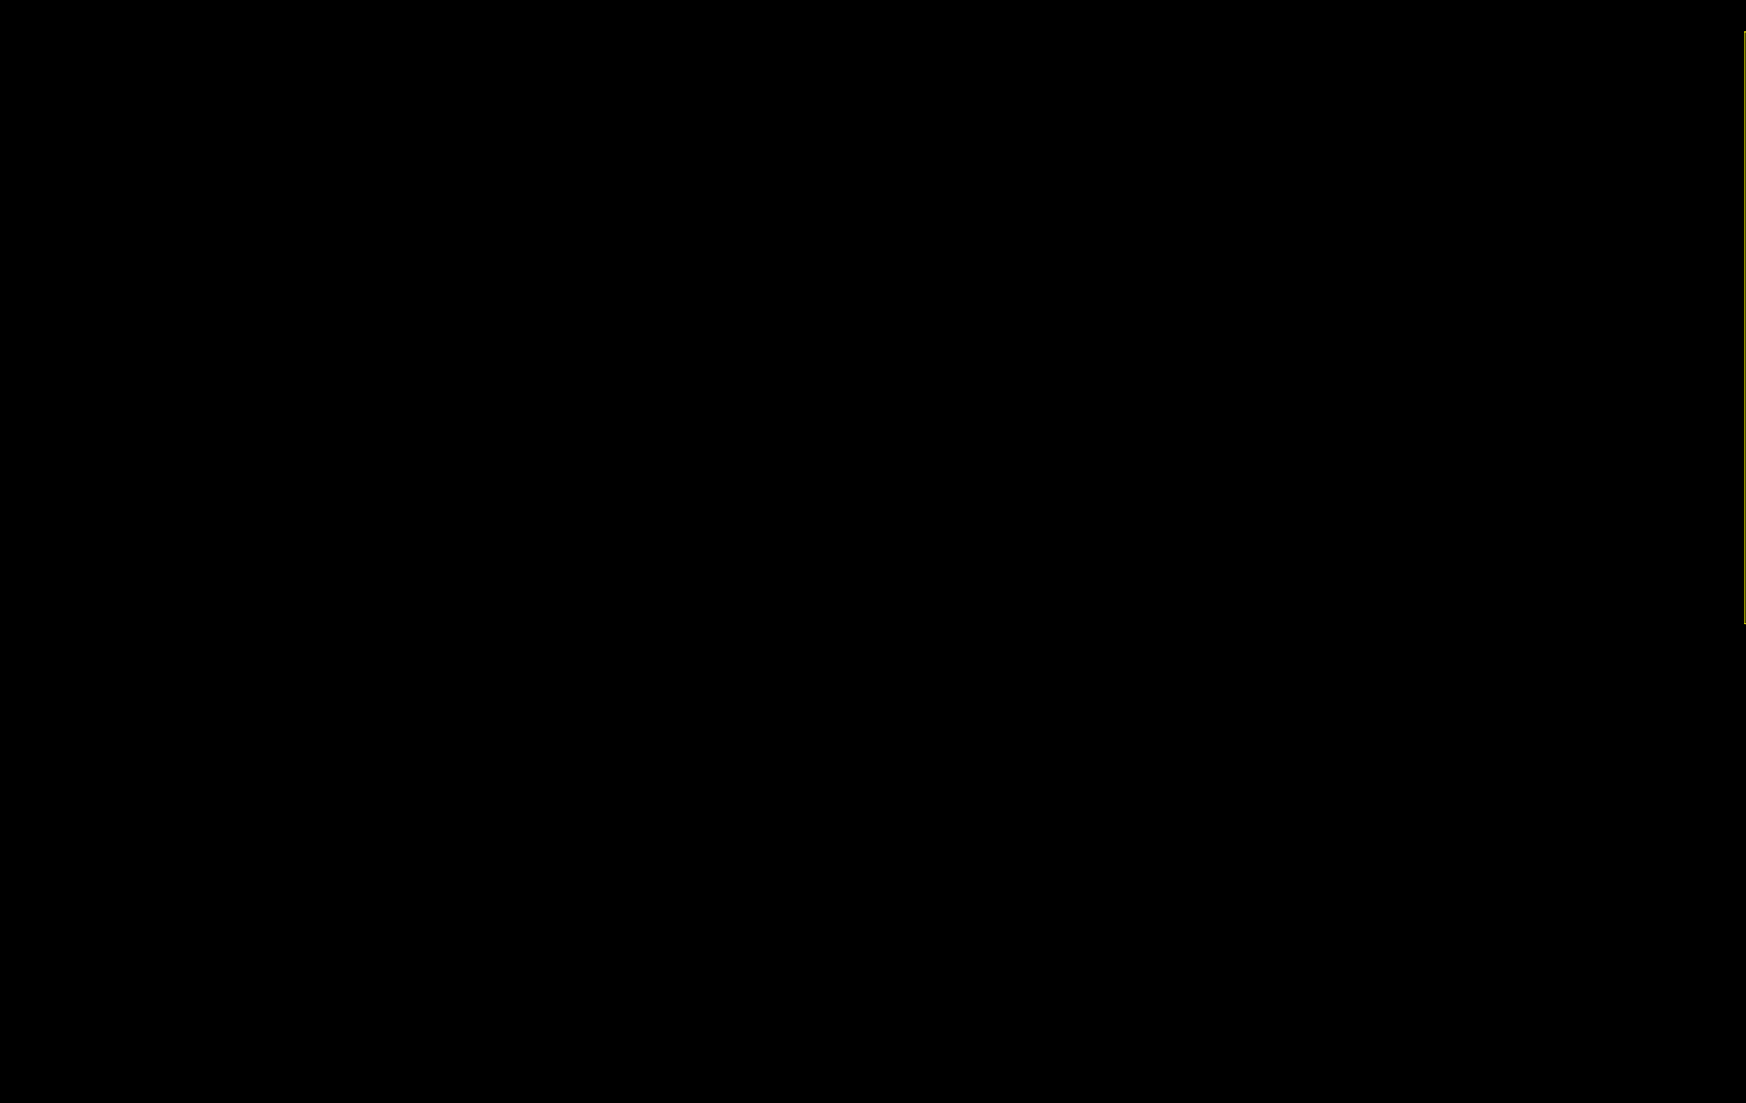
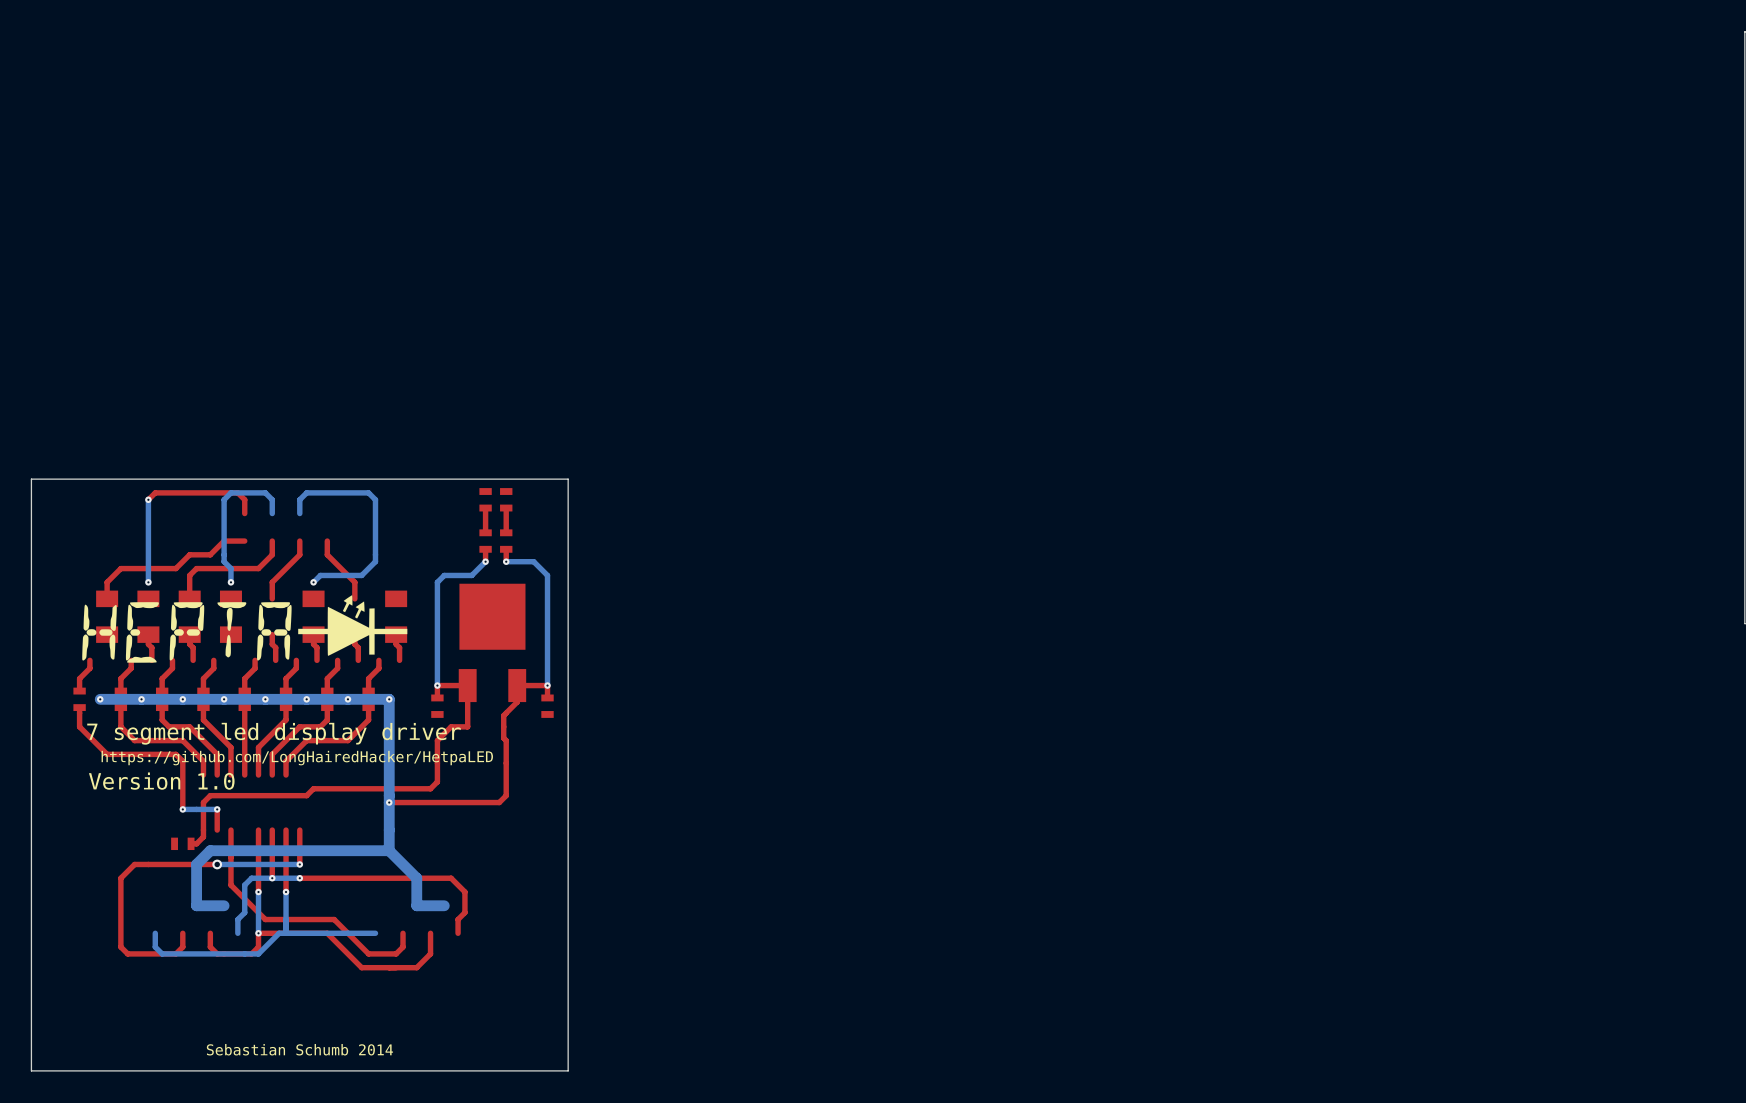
board edge: none -> (568, 479) (31, 479) (31, 1070) (568, 1070) (568, 479)
top track: none -> (148, 499) (155, 492) (237, 492) (244, 499) (244, 513)
bottom track: none -> (148, 499) (148, 582)
via: none -> (148, 499)
part: none -> (485, 499)
part: none -> (506, 499)
top track: none -> (485, 508) (485, 532)
top track: none -> (506, 508) (506, 532)
bottom track: none -> (272, 513) (272, 499) (265, 492) (230, 492) (224, 499) (224, 561) (230, 568) (230, 582)
bottom track: none -> (299, 513) (299, 499) (306, 492) (368, 492) (375, 499) (375, 561) (361, 575) (320, 575) (313, 582)
top track: none -> (244, 541) (224, 541) (210, 554) (189, 554) (175, 568) (120, 568) (107, 582) (107, 598)
top track: none -> (272, 541) (272, 554) (258, 568) (196, 568) (189, 575) (189, 598)
top track: none -> (299, 541) (299, 554) (272, 582) (272, 598)
top track: none -> (327, 541) (327, 554) (354, 582) (354, 598)
part: none -> (485, 541)
part: none -> (506, 541)
top track: none -> (485, 549) (485, 561)
top track: none -> (506, 549) (506, 561)
bottom track: none -> (485, 561) (471, 575) (444, 575) (437, 582) (437, 685)
via: none -> (485, 561)
bottom track: none -> (506, 561) (533, 561) (547, 575) (547, 685)
via: none -> (506, 561)
via: none -> (148, 582)
via: none -> (230, 582)
via: none -> (313, 582)
drawing: none -> [82, 595, 408, 663]
part: none -> (107, 616)
part: none -> (148, 616)
part: none -> (189, 616)
part: none -> (230, 616)
part: none -> (313, 616)
part: none -> (396, 616)
top track: none -> (148, 634) (148, 644) (151, 647) (151, 660)
top track: none -> (189, 634) (189, 644) (193, 647) (193, 660)
top track: none -> (272, 634) (272, 644) (275, 647) (275, 660)
top track: none -> (313, 634) (313, 644) (316, 647) (316, 660)
top track: none -> (354, 634) (354, 644) (358, 647) (358, 660)
top track: none -> (396, 634) (396, 644) (399, 647) (399, 660)
part: none -> (492, 642)
top track: none -> (89, 660) (89, 668) (79, 678) (79, 691)
top track: none -> (131, 660) (131, 668) (120, 678) (120, 691)
top track: none -> (172, 660) (172, 668) (162, 678) (162, 691)
top track: none -> (213, 660) (213, 668) (203, 678) (203, 691)
top track: none -> (255, 660) (255, 668) (244, 678) (244, 691)
top track: none -> (296, 660) (296, 668) (286, 678) (286, 691)
top track: none -> (337, 660) (337, 668) (327, 678) (327, 691)
top track: none -> (378, 660) (378, 668) (368, 678) (368, 691)
via: none -> (437, 685)
via: none -> (547, 685)
top track: none -> (437, 697) (437, 685) (467, 685) (467, 726) (451, 726) (437, 740) (437, 781) (430, 788) (313, 788) (306, 795) (210, 795) (203, 802) (203, 836) (196, 843) (191, 843)
top track: none -> (547, 697) (547, 685) (517, 685) (517, 702) (503, 715) (503, 738) (506, 740) (506, 795) (499, 802) (389, 802)
part: none -> (79, 699)
bottom track: none -> (100, 699) (389, 699) (389, 850)
via: none -> (100, 699)
part: none -> (120, 699)
via: none -> (141, 699)
part: none -> (162, 699)
via: none -> (182, 699)
part: none -> (203, 699)
via: none -> (224, 699)
part: none -> (244, 699)
via: none -> (265, 699)
part: none -> (286, 699)
via: none -> (306, 699)
part: none -> (327, 699)
via: none -> (347, 699)
part: none -> (368, 699)
via: none -> (389, 699)
part: none -> (437, 706)
part: none -> (547, 706)
top track: none -> (79, 707) (79, 726) (107, 754) (175, 754) (182, 761) (182, 809)
top track: none -> (120, 707) (120, 726) (134, 740) (182, 740) (203, 761) (203, 775)
top track: none -> (162, 707) (162, 719) (169, 726) (189, 726) (217, 754) (217, 775)
top track: none -> (203, 707) (203, 719) (230, 747) (230, 775)
top track: none -> (244, 707) (244, 775)
top track: none -> (286, 707) (286, 719) (258, 747) (258, 775)
top track: none -> (327, 707) (327, 719) (320, 726) (299, 726) (272, 754) (272, 775)
top track: none -> (368, 707) (368, 719) (347, 740) (306, 740) (286, 761) (286, 775)
text: none -> 7 segment led display driver (273, 733)
text: none -> https://github.com/LongHairedHacker/HetpaLED (297, 758)
text: none -> Version 1.0 (161, 781)
via: none -> (389, 802)
via: none -> (182, 809)
top track: none -> (217, 809) (217, 830)
bottom track: none -> (217, 809) (182, 809)
via: none -> (217, 809)
top track: none -> (230, 830) (230, 885) (265, 919) (334, 919) (368, 953) (396, 953) (403, 947) (403, 933)
top track: none -> (258, 830) (258, 892)
top track: none -> (272, 830) (272, 878)
top track: none -> (286, 830) (286, 892)
top track: none -> (299, 830) (299, 864)
part: none -> (182, 843)
bottom track: none -> (389, 850) (210, 850) (196, 864) (196, 905) (224, 905)
bottom track: none -> (389, 850) (416, 878) (416, 905) (444, 905)
top track: none -> (217, 864) (134, 864) (120, 878) (120, 947) (127, 953) (175, 953) (182, 947) (182, 933)
via: none -> (217, 864)
bottom track: none -> (299, 864) (217, 864)
via: none -> (299, 864)
via: none -> (272, 878)
top track: none -> (299, 878) (451, 878) (464, 892) (464, 912) (458, 919) (458, 933)
bottom track: none -> (299, 878) (251, 878) (244, 885) (244, 912) (237, 919) (237, 933)
via: none -> (299, 878)
bottom track: none -> (258, 892) (258, 933)
via: none -> (258, 892)
bottom track: none -> (286, 892) (286, 933)
via: none -> (286, 892)
via: none -> (258, 933)
bottom track: none -> (375, 933) (279, 933) (258, 953) (162, 953) (155, 947) (155, 933)
top track: none -> (430, 933) (430, 953) (416, 967) (361, 967) (327, 933) (258, 933) (258, 947) (251, 953) (217, 953) (210, 947) (210, 933)
text: none -> Sebastian Schumb 2014 (299, 1049)

